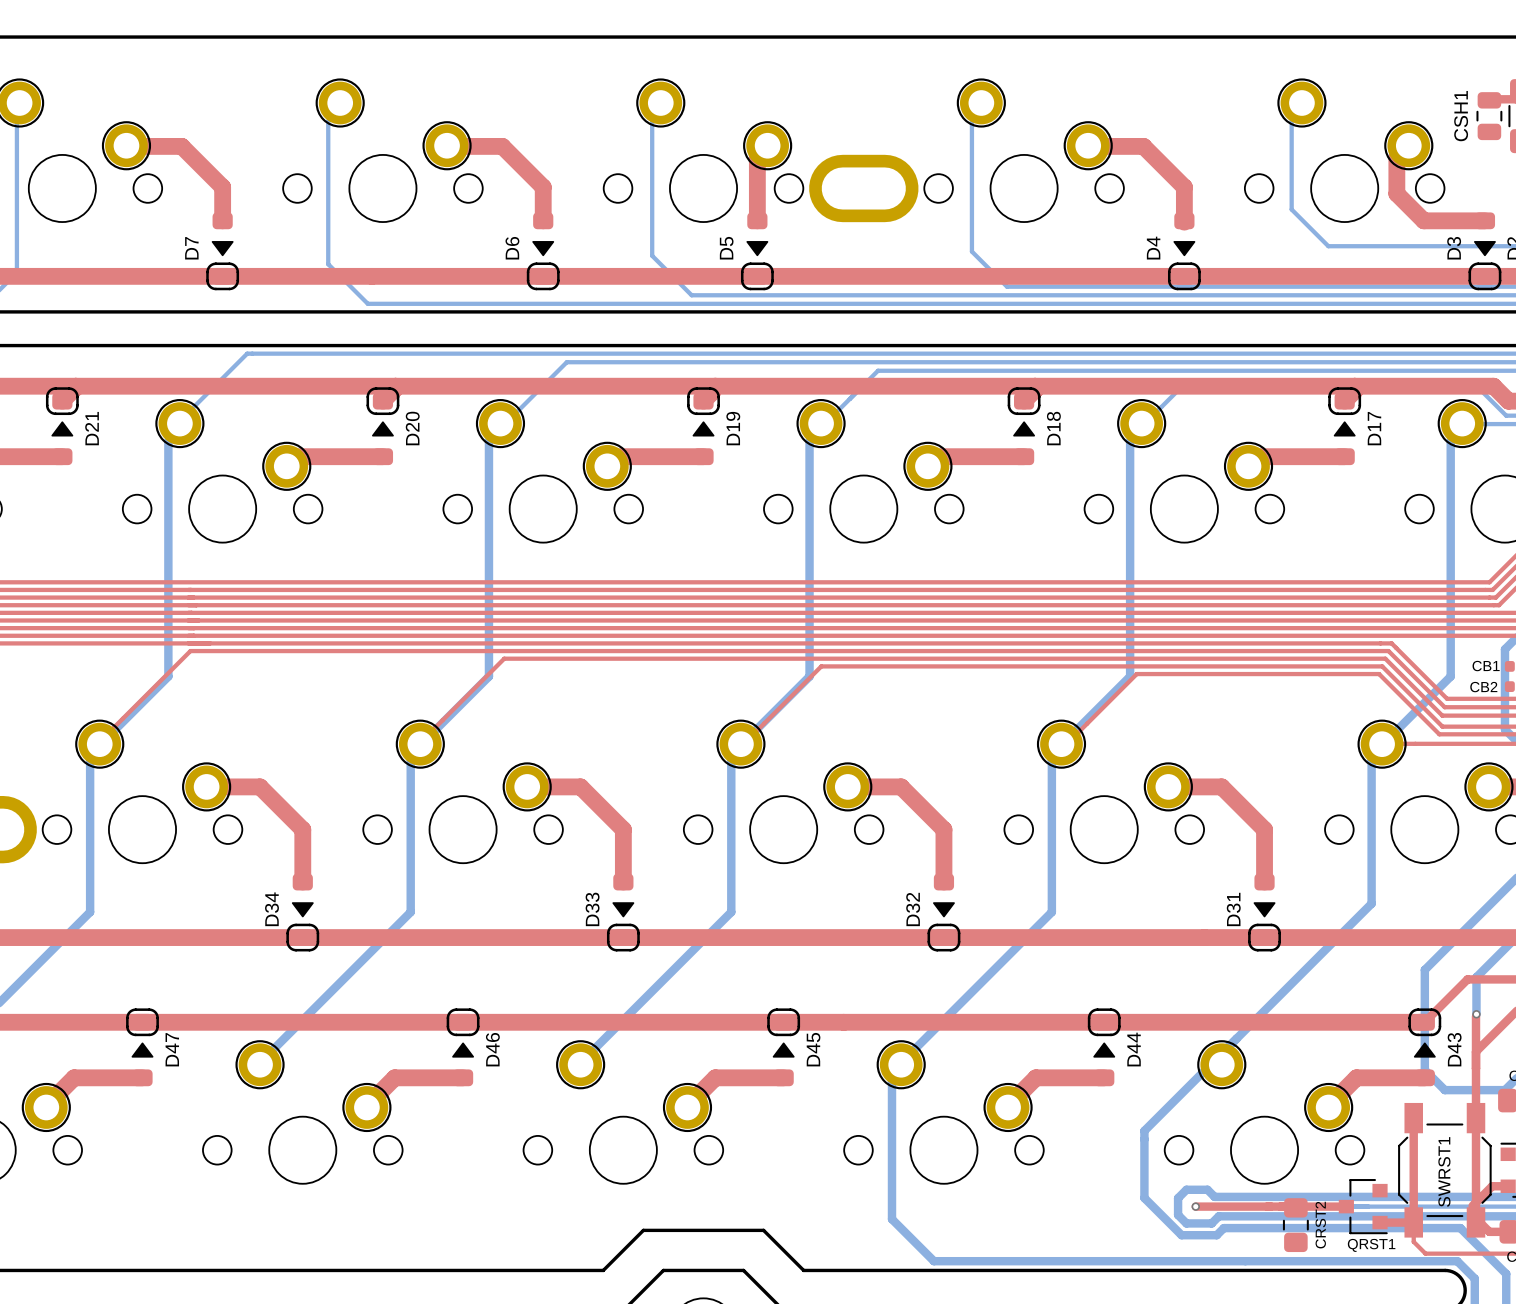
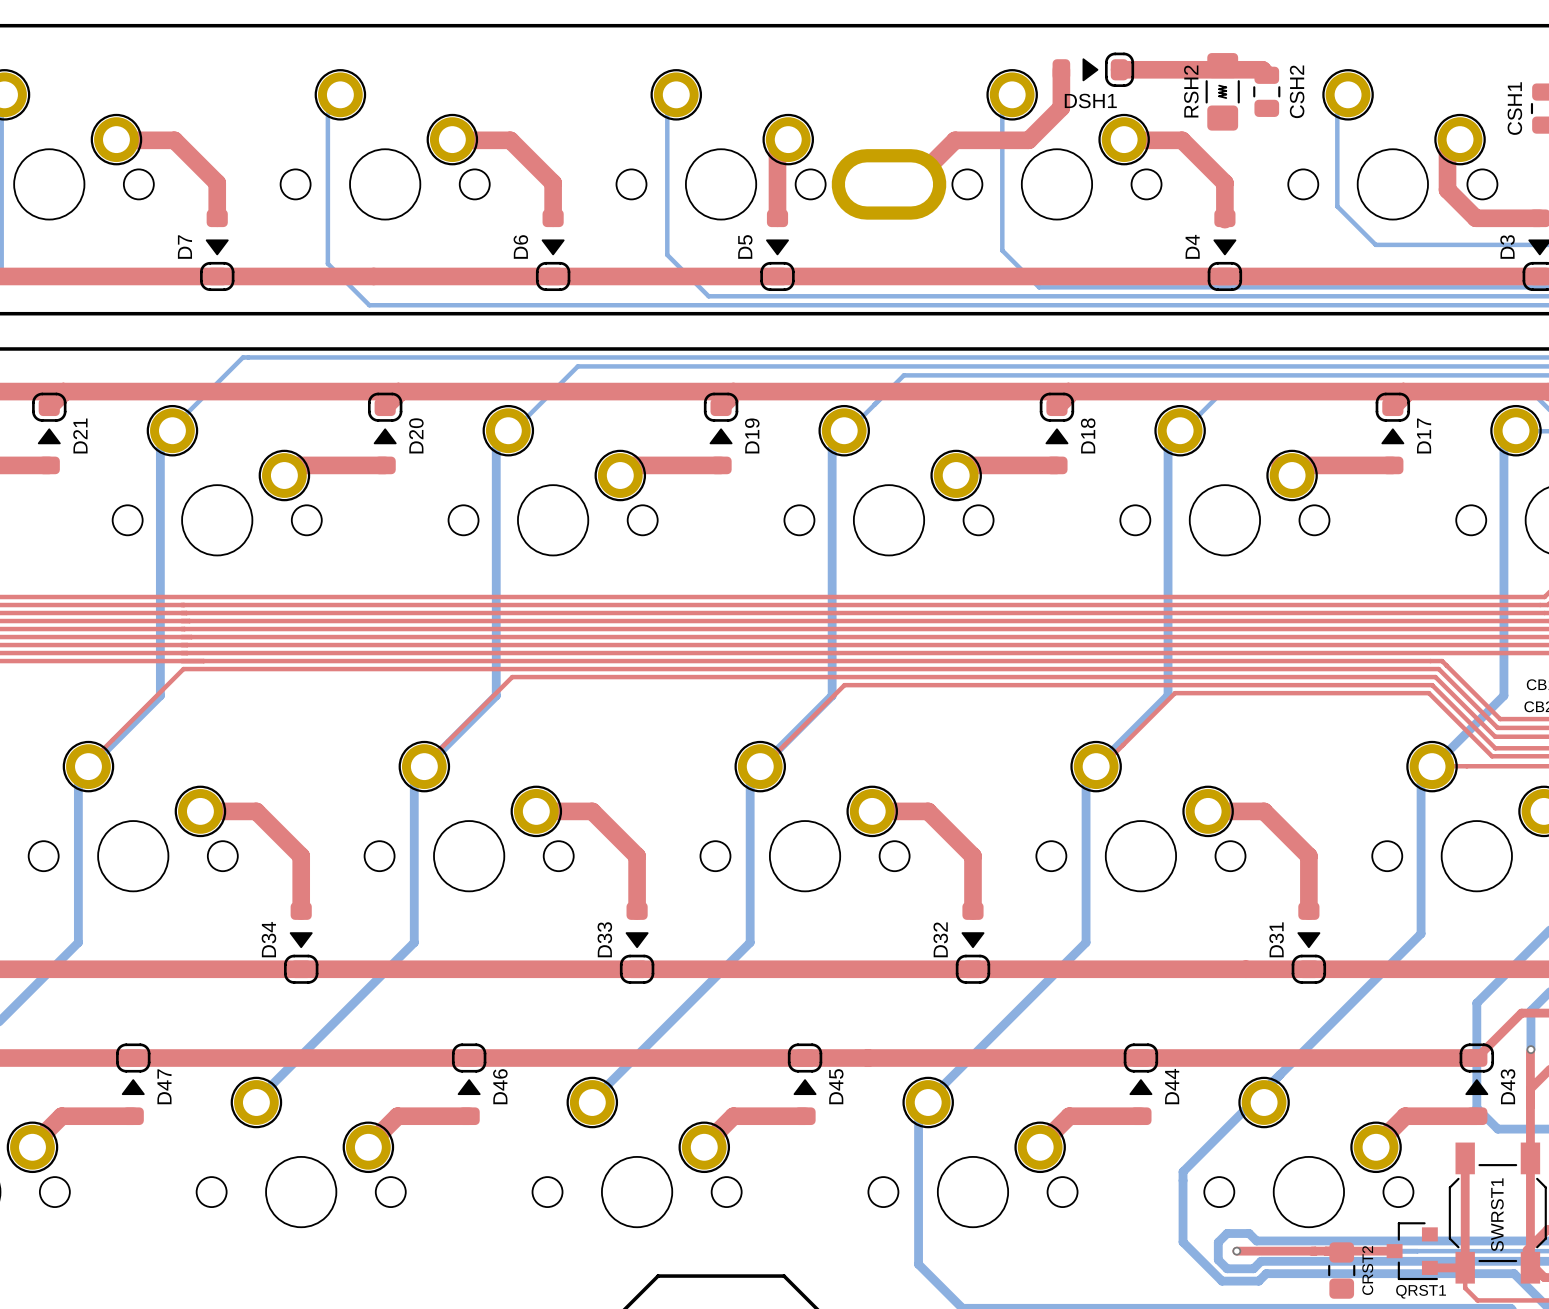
top track: none -> (1061, 69) (1061, 107) (1028, 140) (955, 140) (911, 184) (889, 184)
DSH1: none -> (1093, 69)
top track: none -> (1119, 69) (1262, 69) (1266, 74)
RSH2: none -> (1222, 91)
CSH2: none -> (1266, 91)

